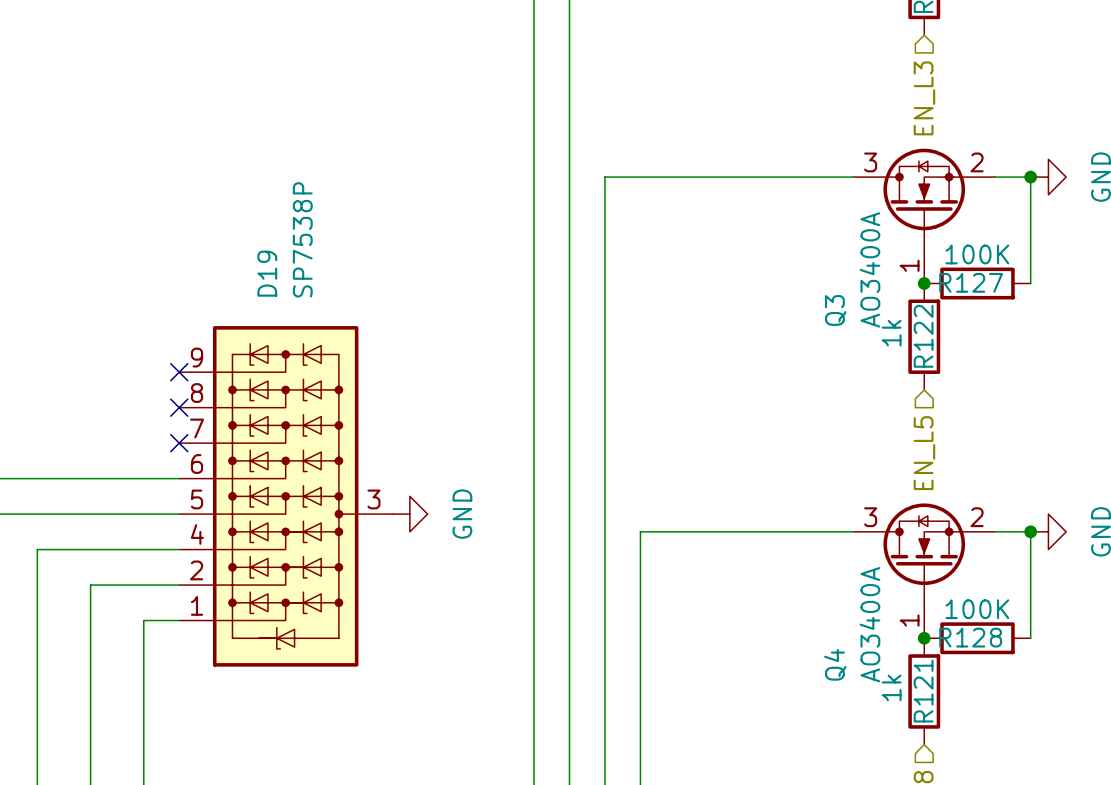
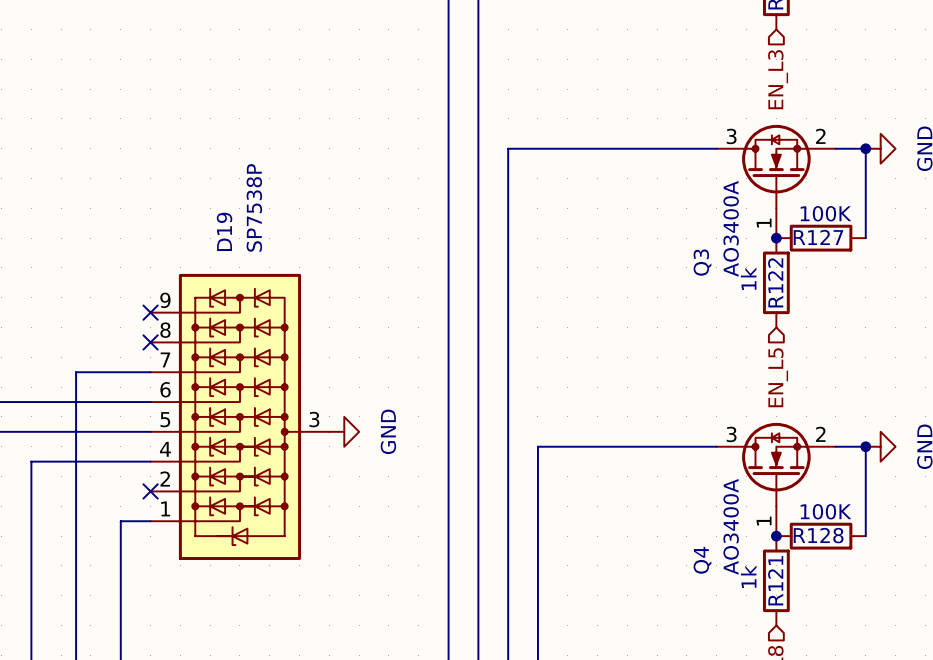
no-connect mark: (179, 443) -> none
wire: (90, 585) (179, 585) -> (76, 491) (76, 372) (150, 372)
no-connect mark: none -> (150, 491)

